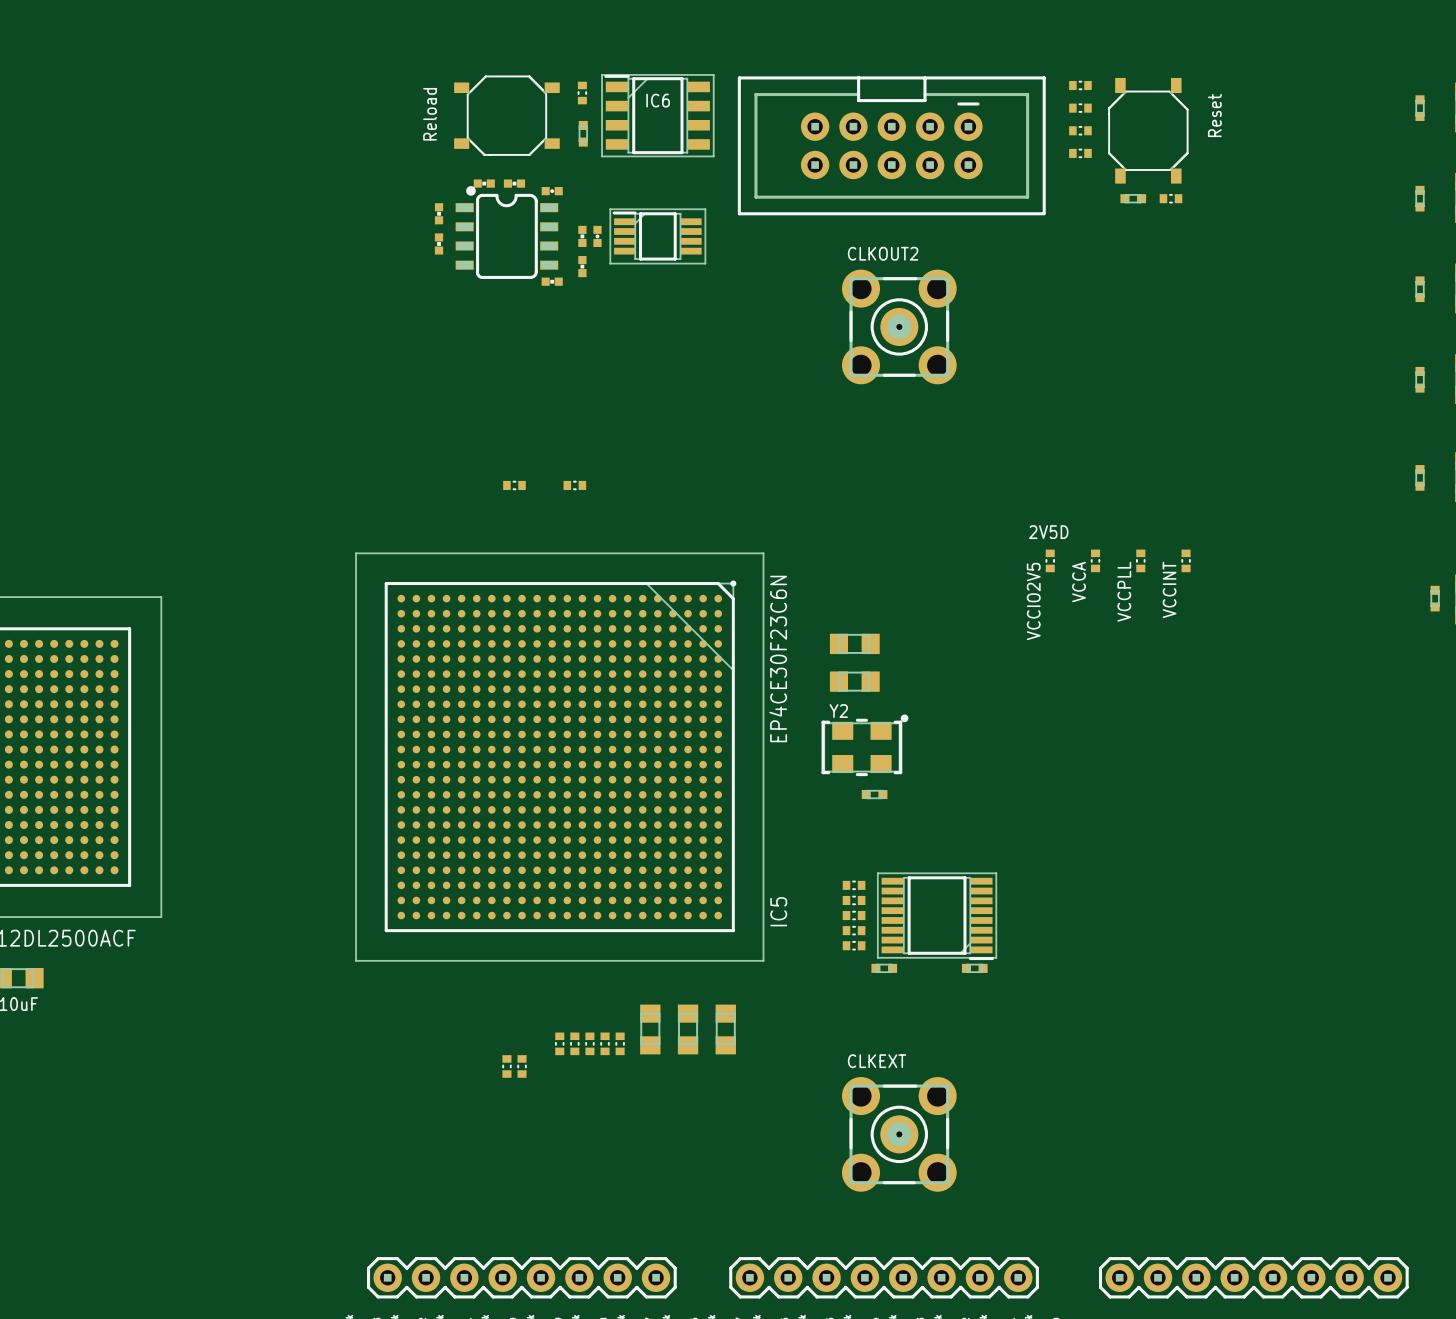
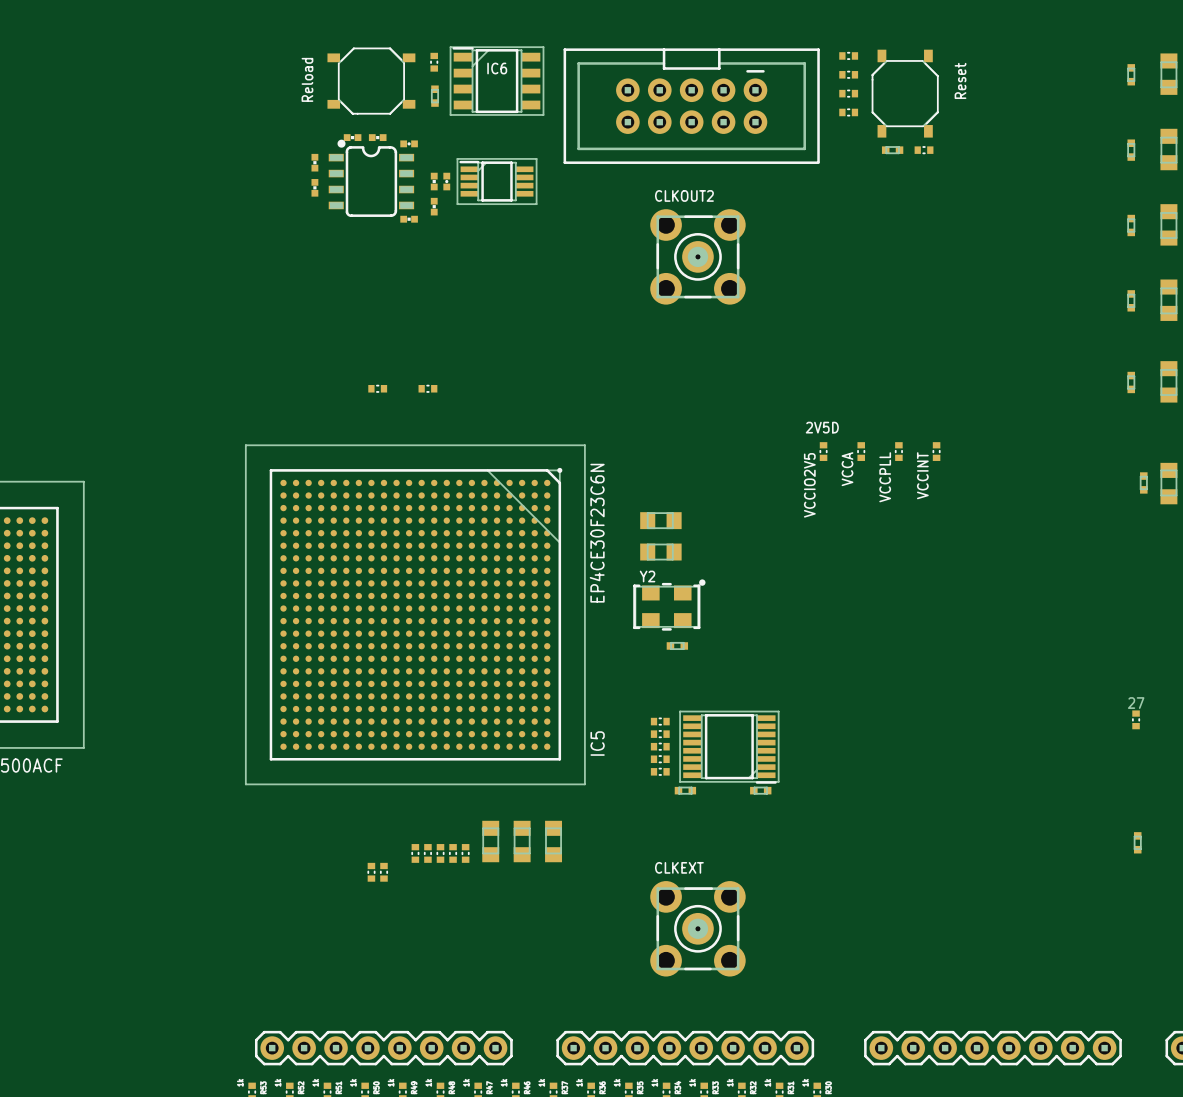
part: none -> 27 (1136, 719)
part: none -> (1137, 842)

